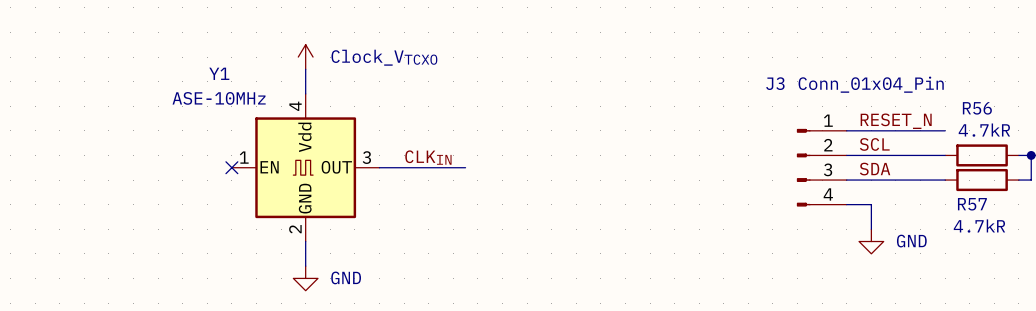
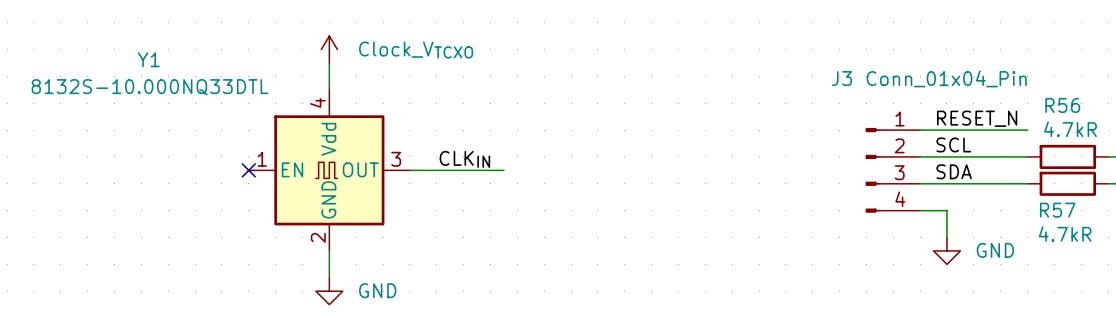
Y1 name position: Y1 (219, 73) -> Y1 (148, 59)
Y1 value: ASE-10MHz (219, 98) -> 8132S-10.000NQ33DTL (150, 87)

